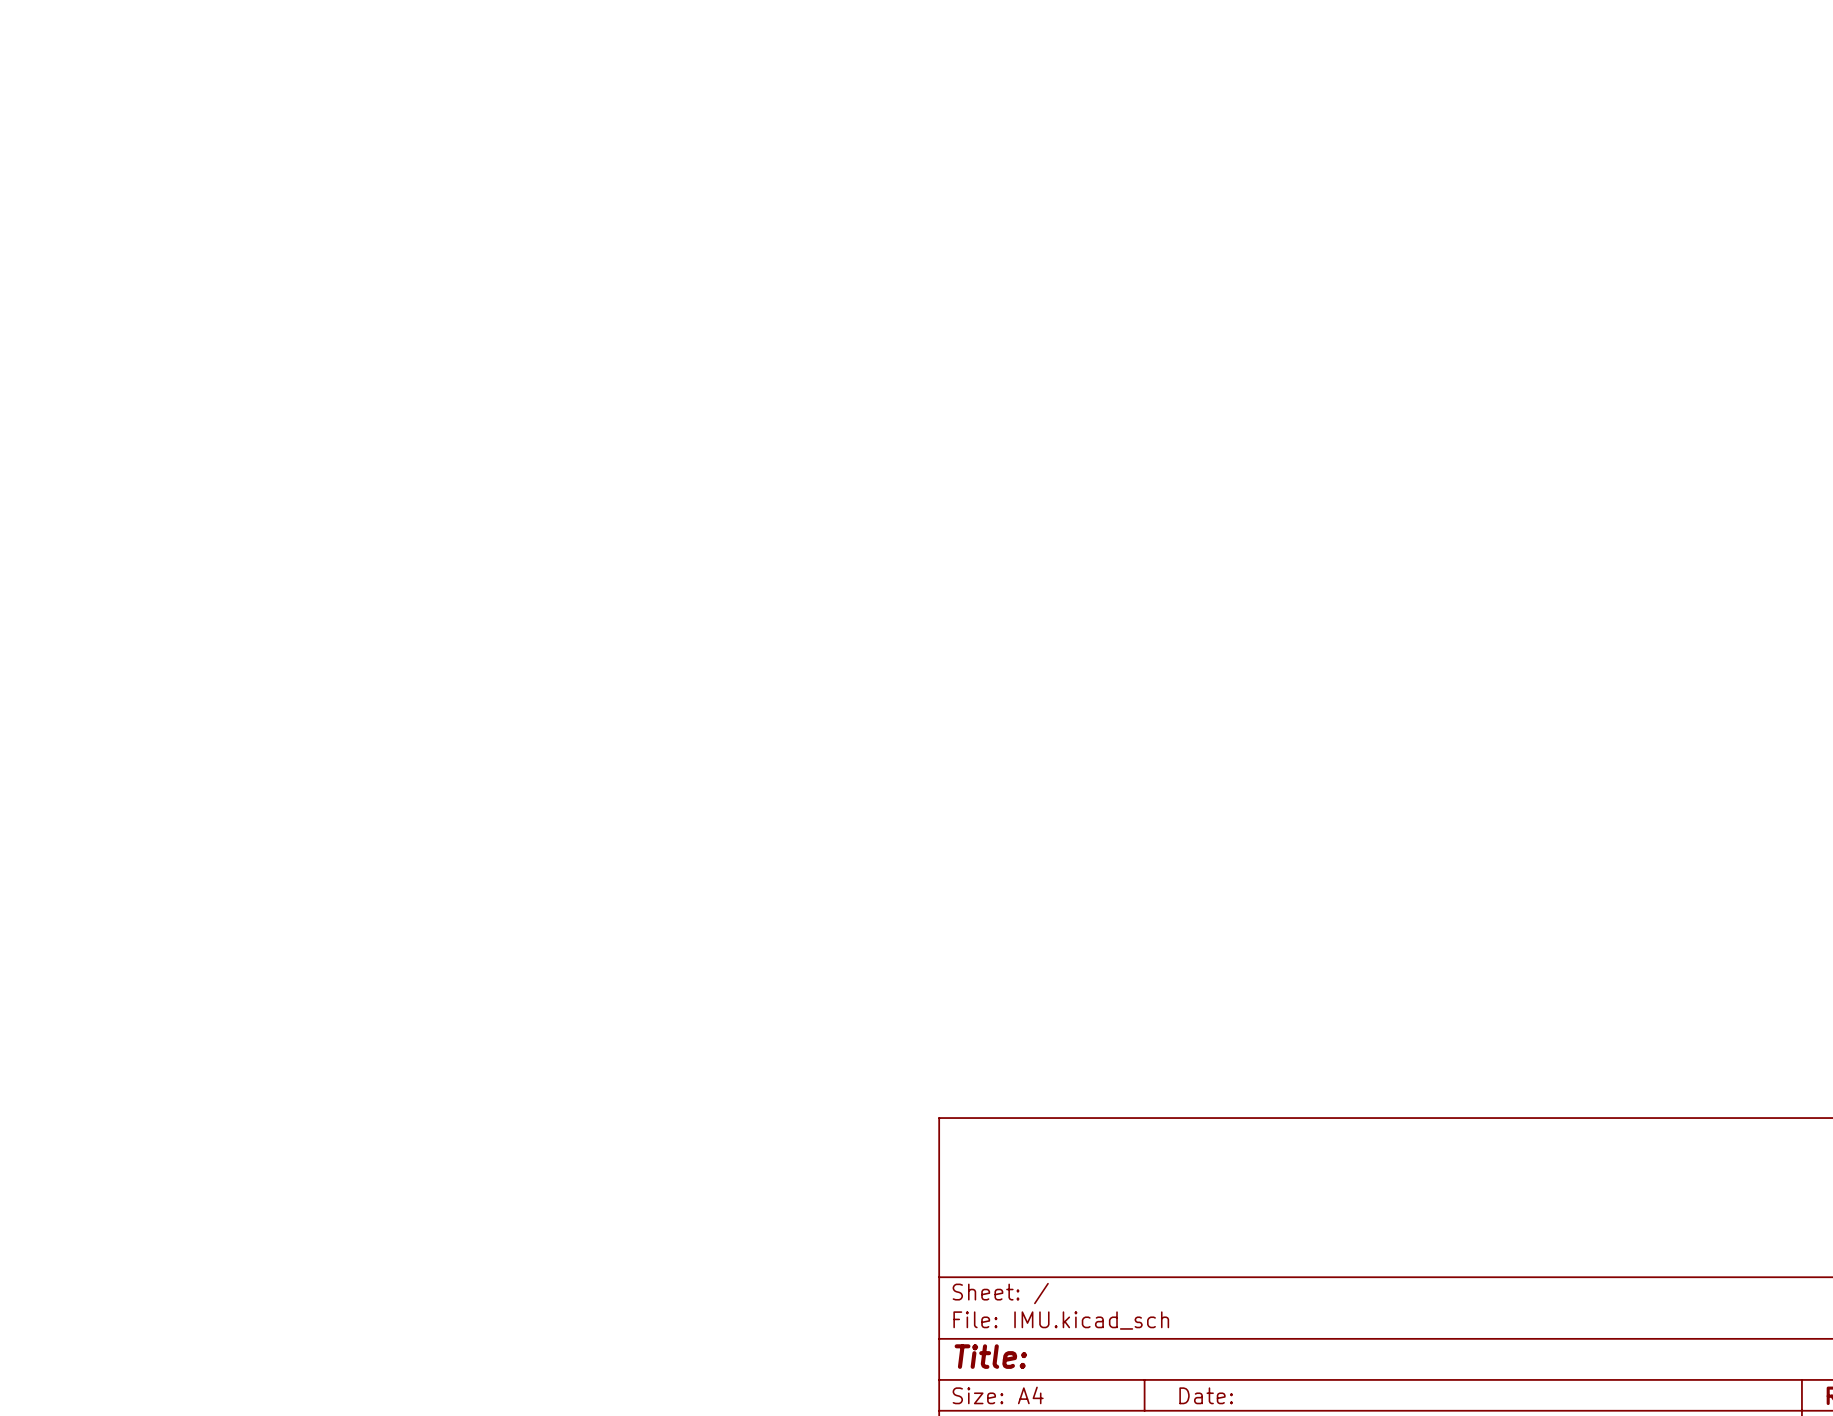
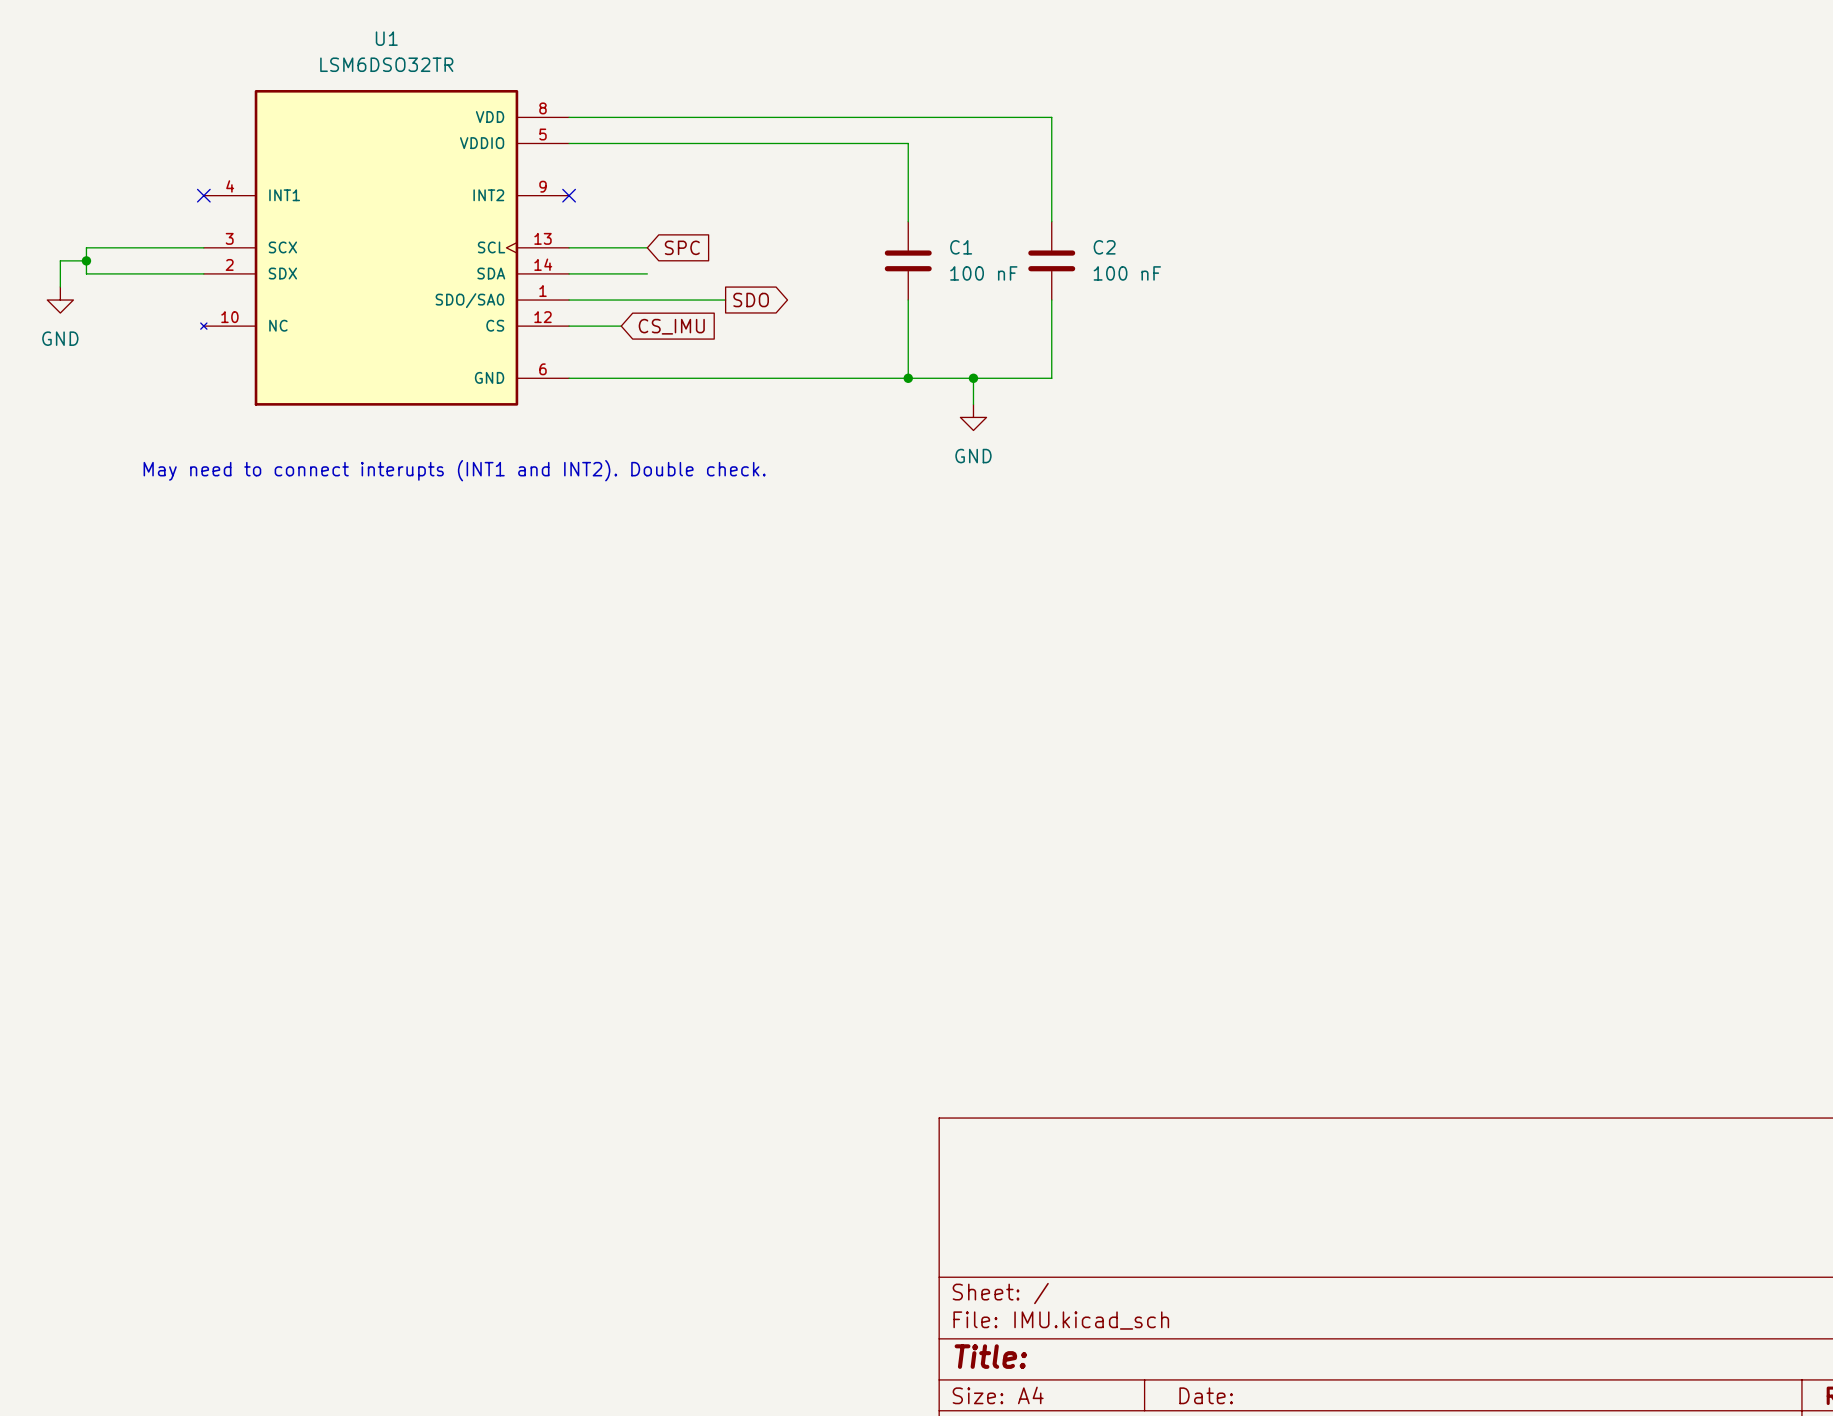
wire: none -> (569, 117) (1051, 117) (1051, 221)
wire: none -> (569, 143) (908, 143) (908, 221)
no-connect mark: none -> (203, 195)
no-connect mark: none -> (569, 195)
wire: none -> (203, 247) (86, 247) (86, 273) (203, 273)
U1: none -> LSM6DSO32TR (384, 247)
wire: none -> (569, 247) (647, 247)
global label: none -> SPC (682, 247)
wire: none -> (86, 260) (60, 260) (60, 286)
junction: none -> (86, 260)
C1: none -> 100 nF (908, 260)
C2: none -> 100 nF (1051, 260)
wire: none -> (569, 273) (647, 273)
power symbol: none -> GND (60, 300)
wire: none -> (569, 300) (725, 300)
global label: none -> SDO (751, 300)
wire: none -> (908, 300) (908, 378)
wire: none -> (1051, 300) (1051, 378) (569, 378)
wire: none -> (569, 326) (621, 326)
global label: none -> CS_IMU (671, 326)
junction: none -> (908, 378)
wire: none -> (973, 378) (973, 404)
junction: none -> (973, 378)
power symbol: none -> GND (973, 417)
text: none -> May need to connect interupts (INT1 and INT2). Double check. (454, 470)

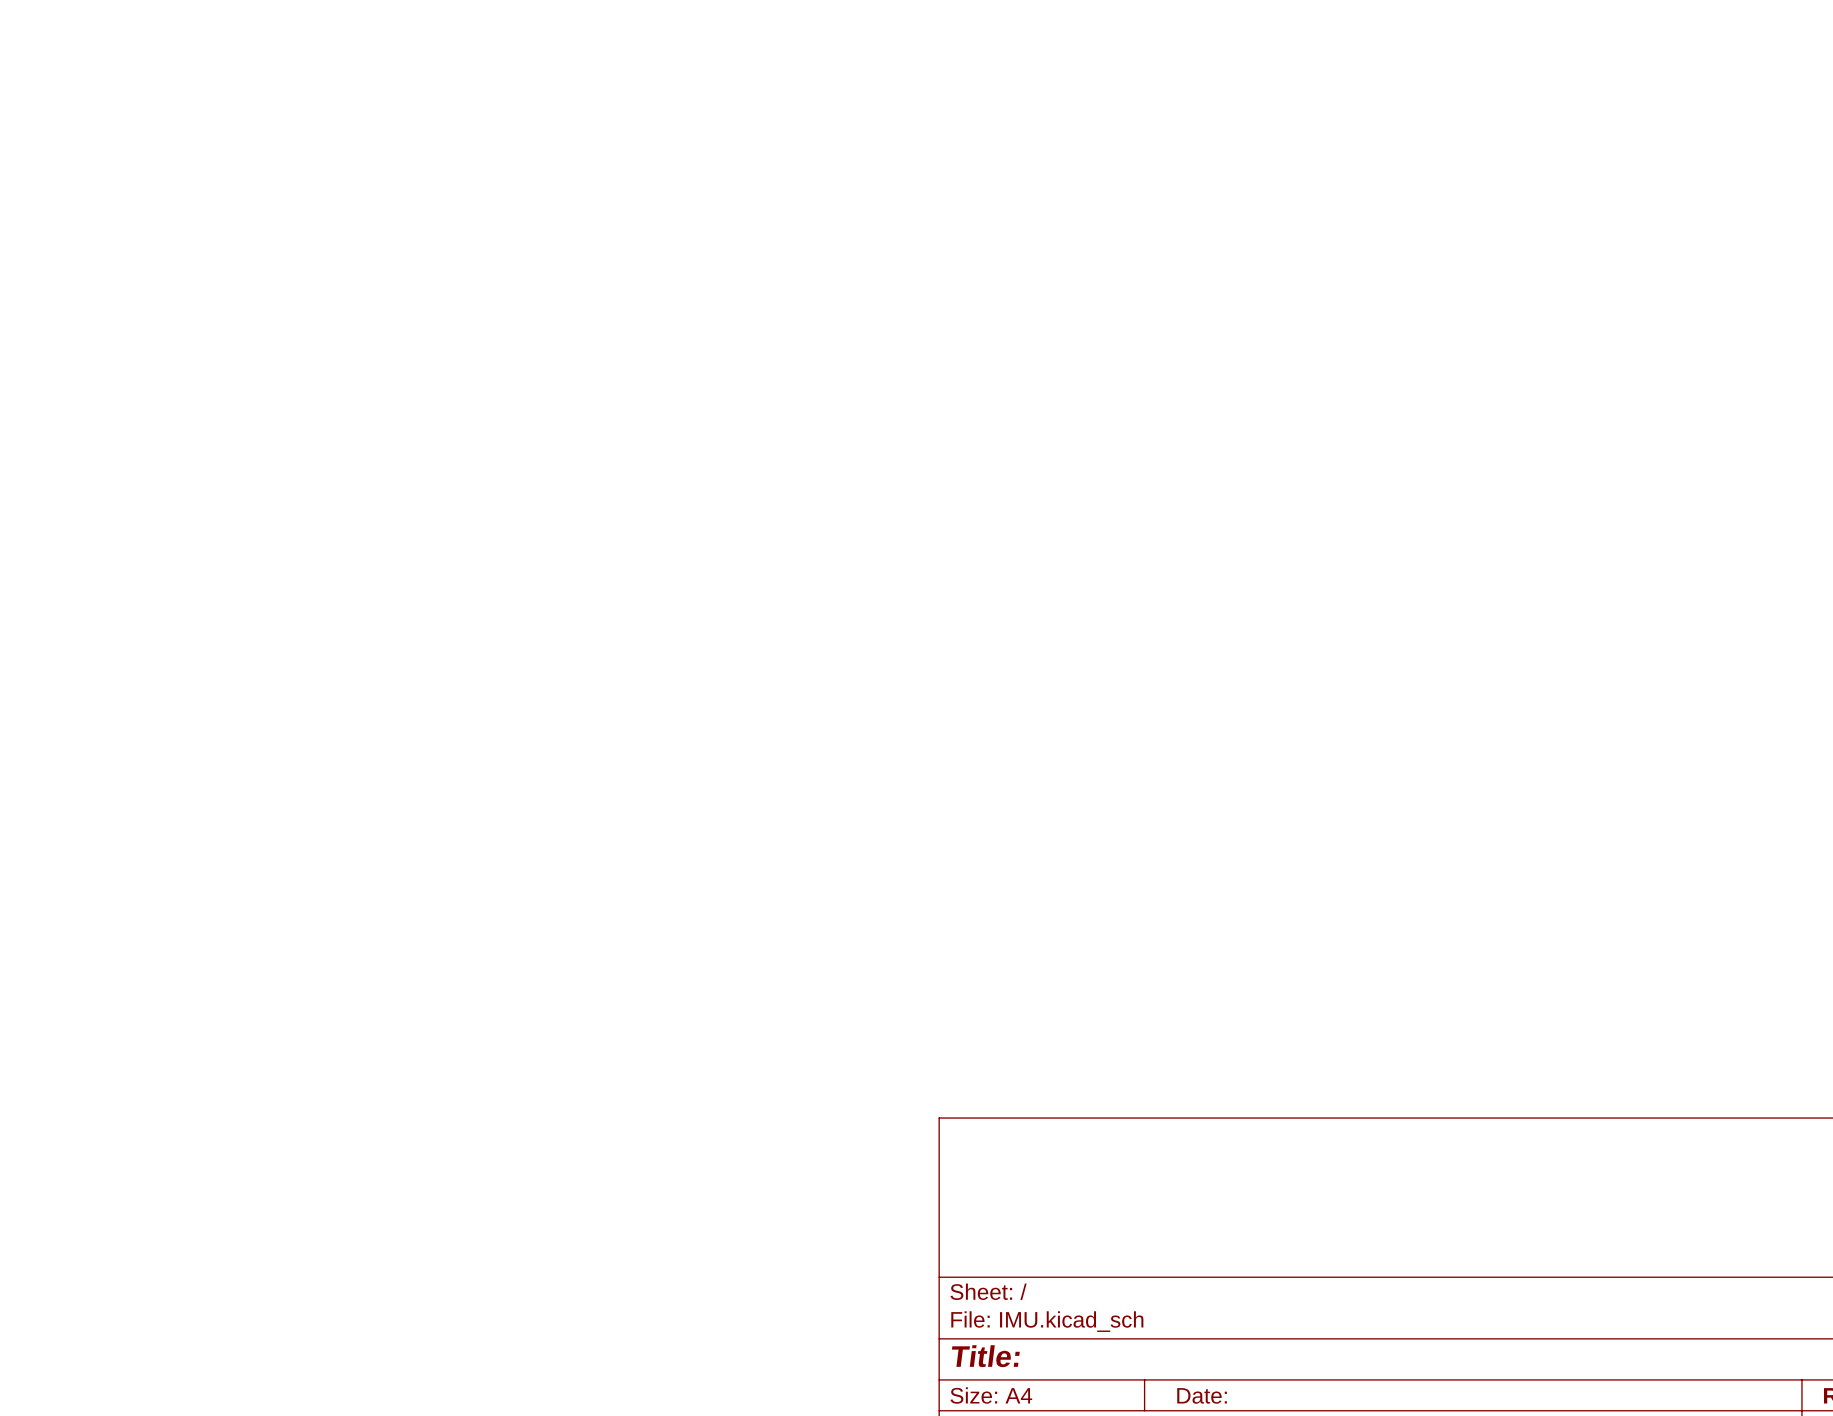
wire: (569, 117) (1051, 117) (1051, 221) -> none
wire: (569, 143) (908, 143) (908, 221) -> none
no-connect mark: (203, 195) -> none
no-connect mark: (569, 195) -> none
wire: (203, 247) (86, 247) (86, 273) (203, 273) -> none
U1: LSM6DSO32TR (384, 247) -> none
wire: (569, 247) (647, 247) -> none
global label: SPC (682, 247) -> none
wire: (86, 260) (60, 260) (60, 286) -> none
junction: (86, 260) -> none
C1: 100 nF (908, 260) -> none
C2: 100 nF (1051, 260) -> none
wire: (569, 273) (647, 273) -> none
power symbol: GND (60, 300) -> none
wire: (569, 300) (725, 300) -> none
global label: SDO (751, 300) -> none
wire: (908, 300) (908, 378) -> none
wire: (1051, 300) (1051, 378) (569, 378) -> none
wire: (569, 326) (621, 326) -> none
global label: CS_IMU (671, 326) -> none
junction: (908, 378) -> none
wire: (973, 378) (973, 404) -> none
junction: (973, 378) -> none
power symbol: GND (973, 417) -> none
text: May need to connect interupts (INT1 and INT2). Double check. (454, 470) -> none

